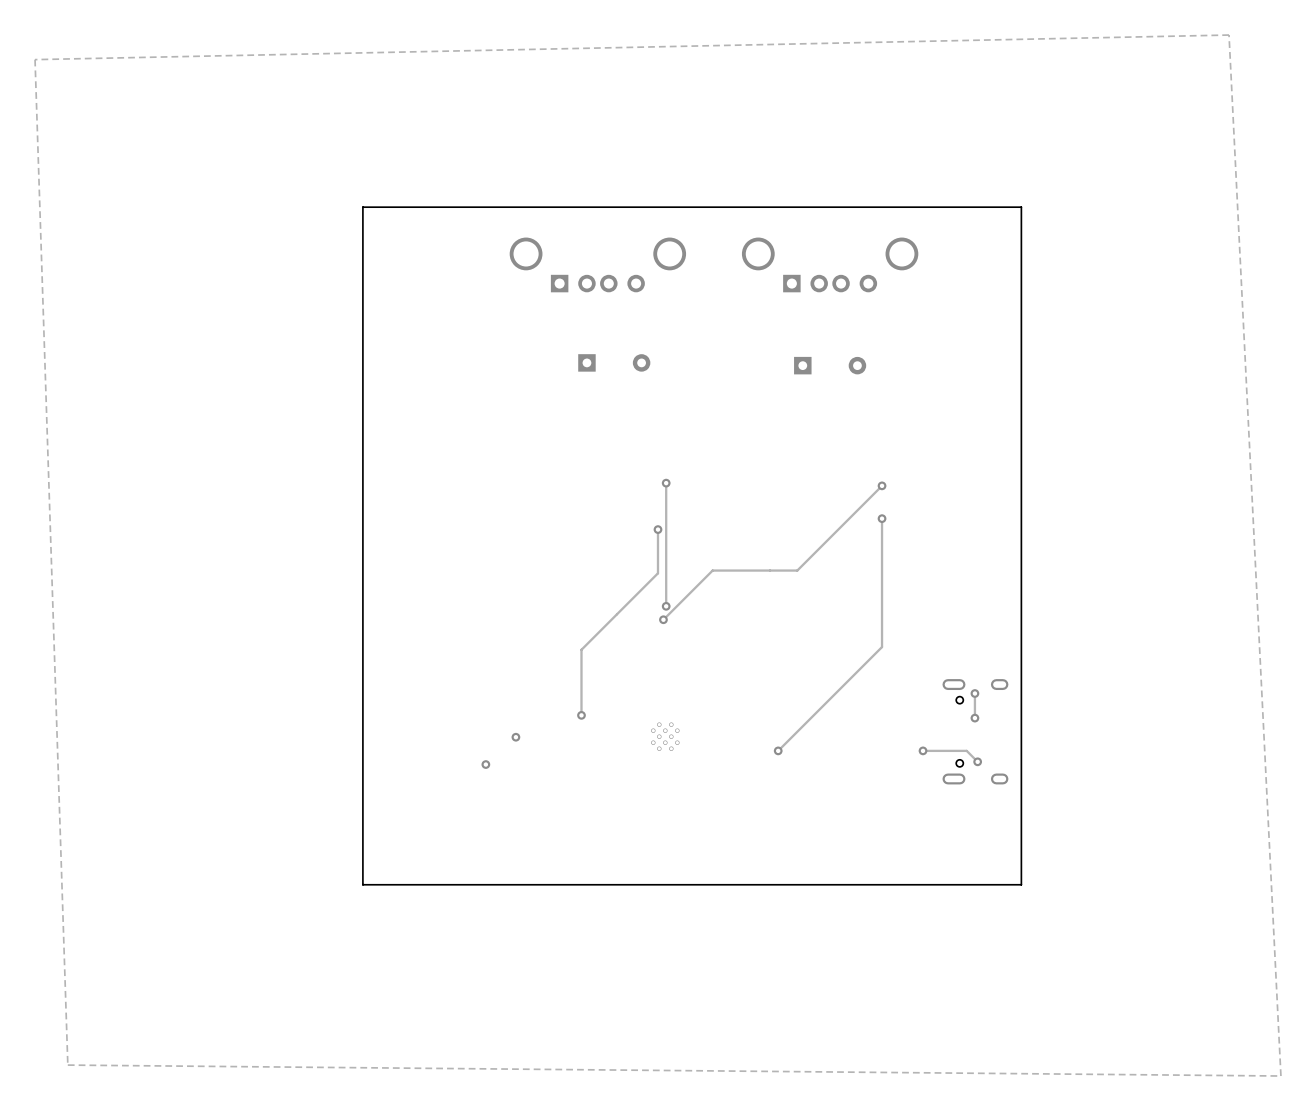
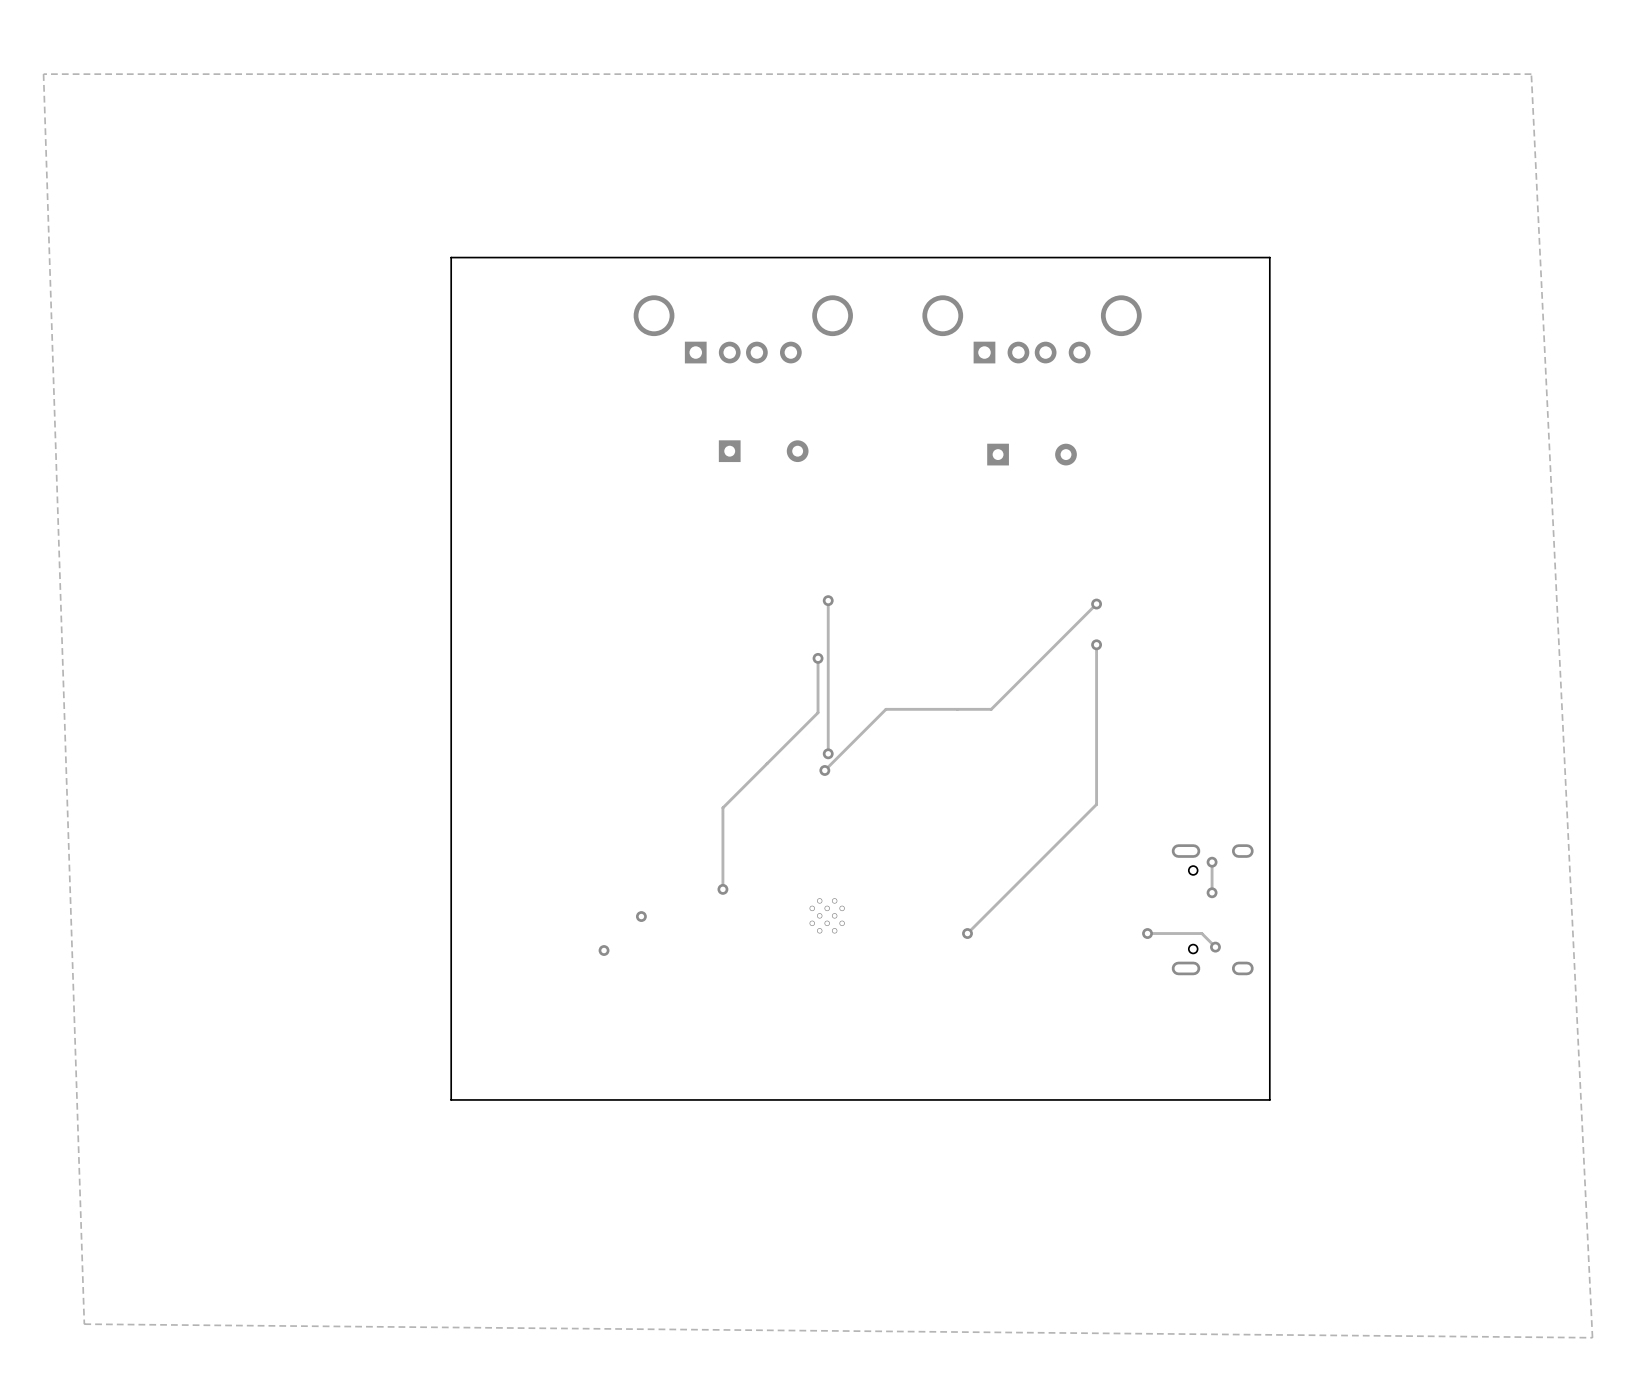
zone outline: (35, 59) (1229, 35) (1280, 1076) -> (43, 74) (1531, 74) (1592, 1337)

